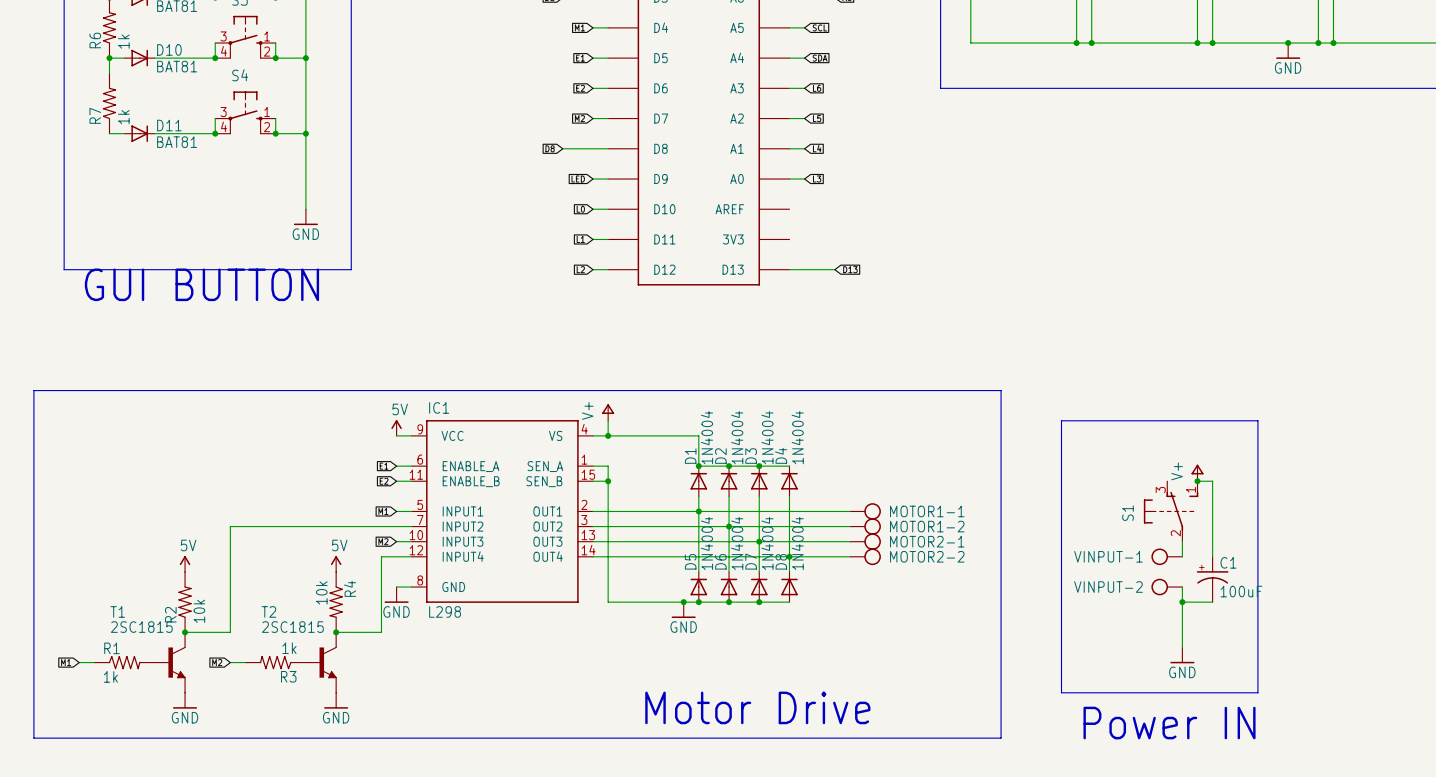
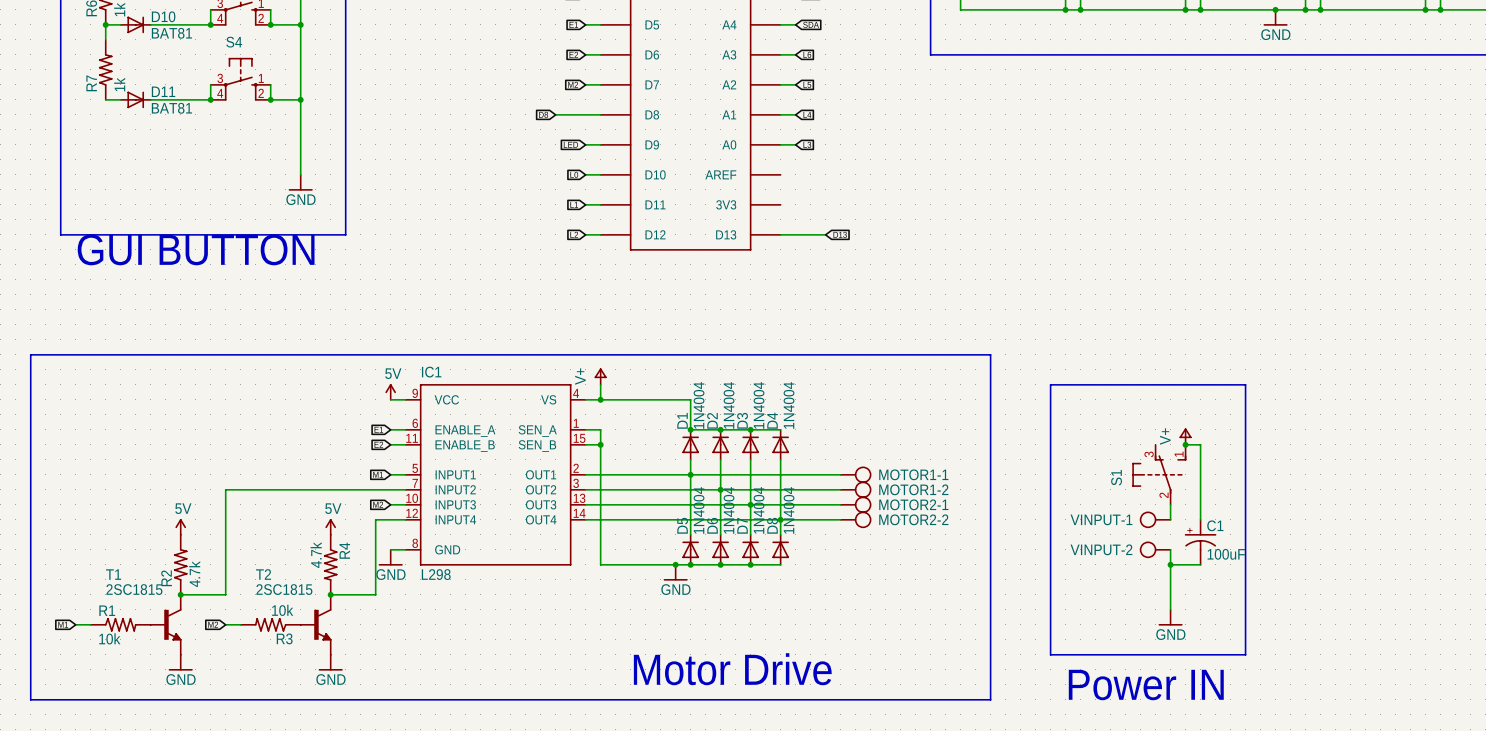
R4 value: 10k (321, 592) -> 4.7k (316, 555)
R2 value: 10k (199, 611) -> 4.7k (194, 574)
R3 value: 1k (289, 648) -> 10k (282, 610)
R1 value: 1k (110, 676) -> 10k (109, 638)

